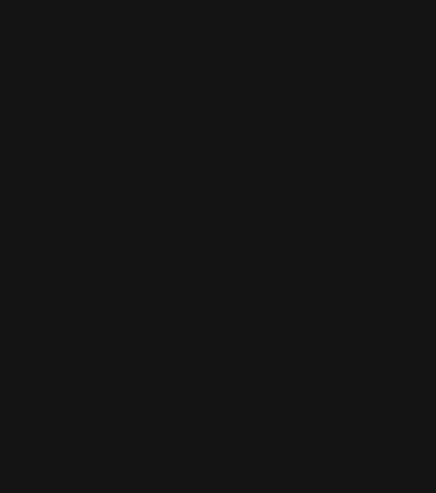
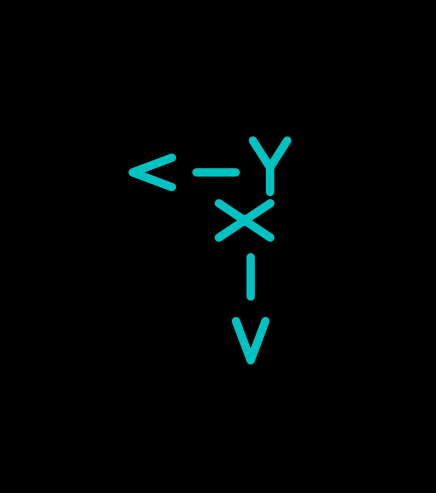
text: none -> <-Y (209, 166)
text: none -> <-X (244, 281)

